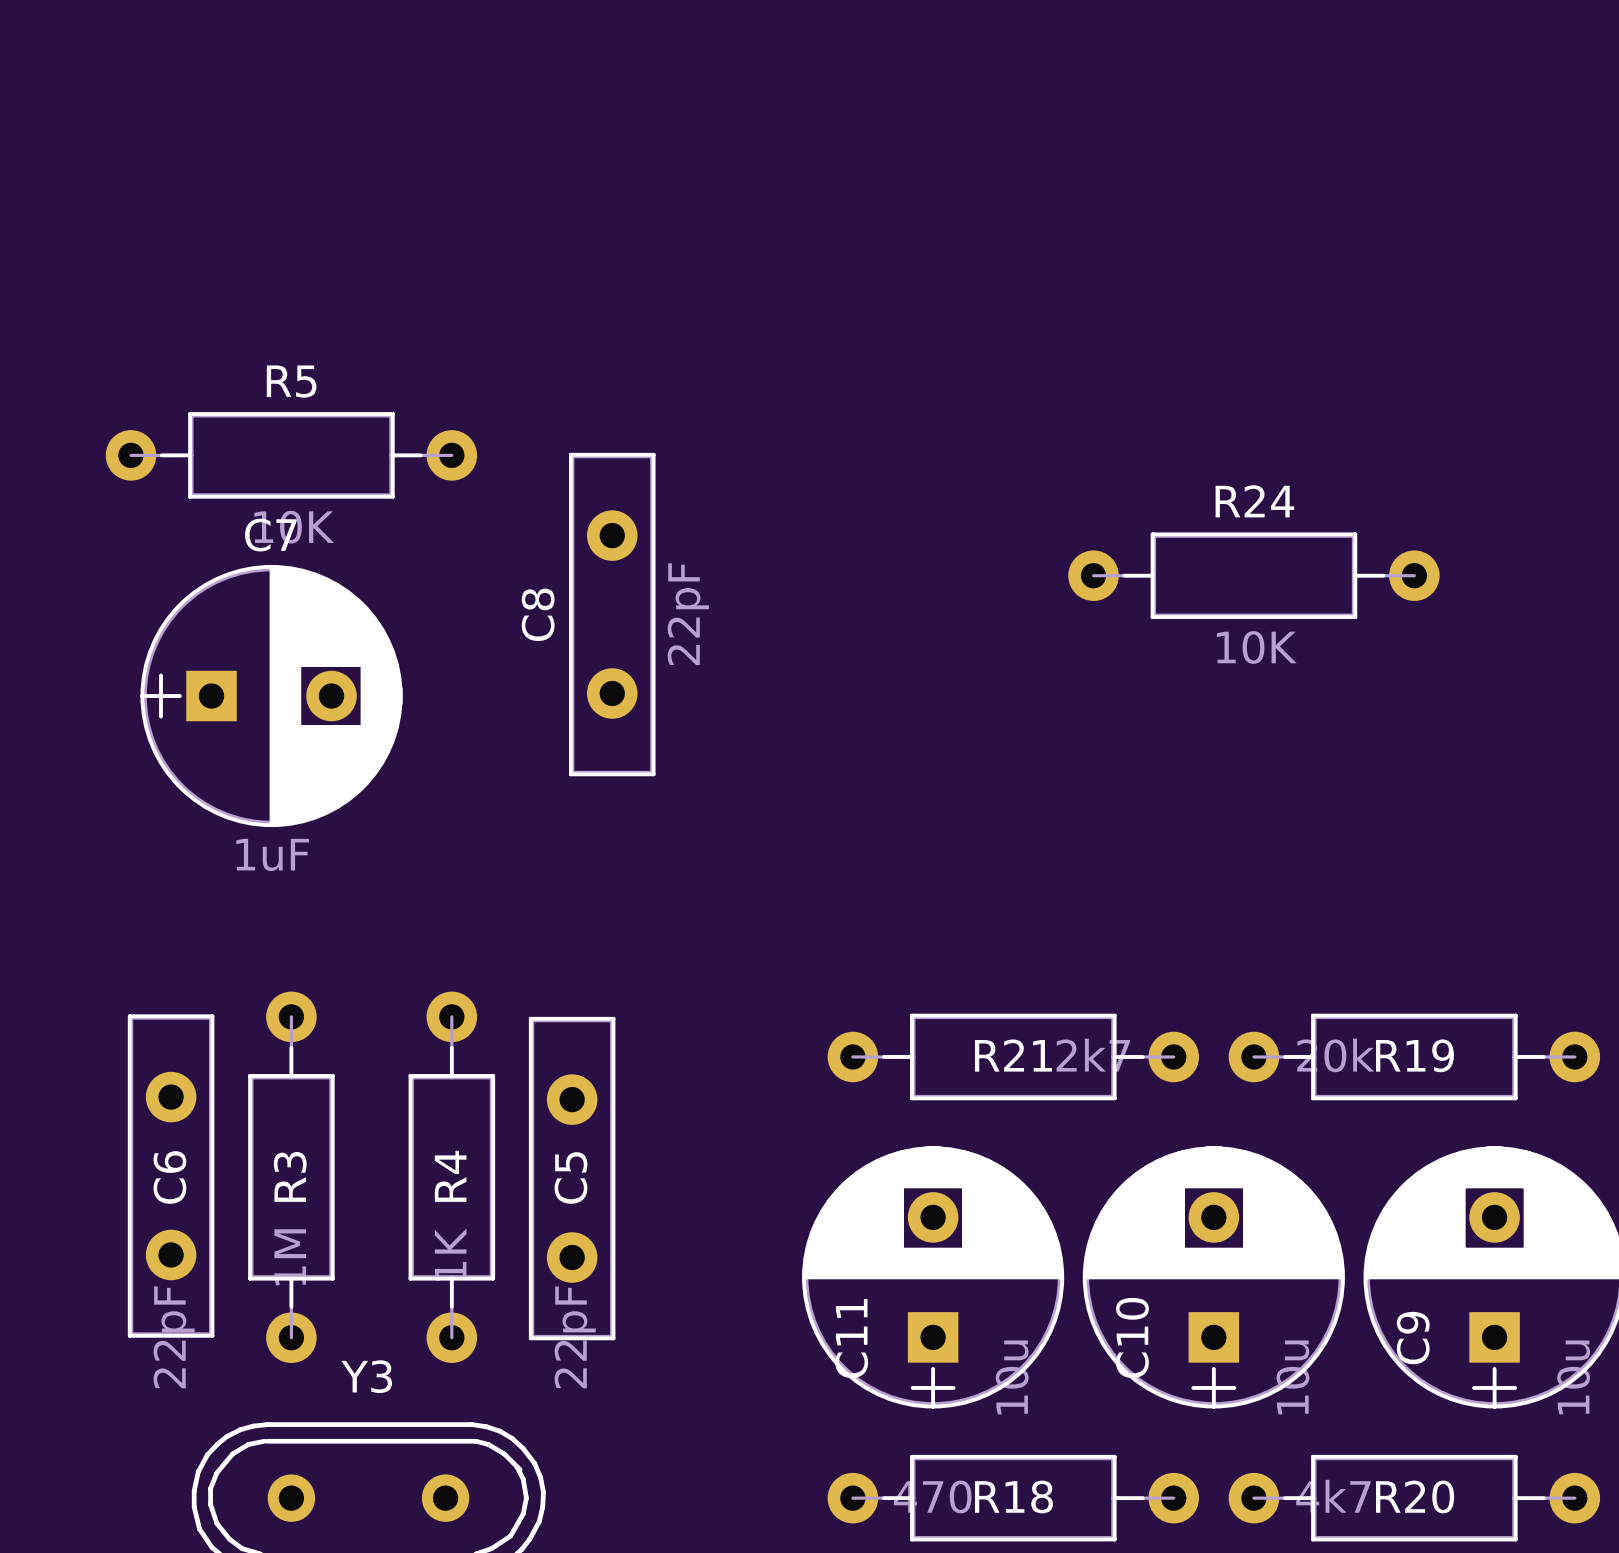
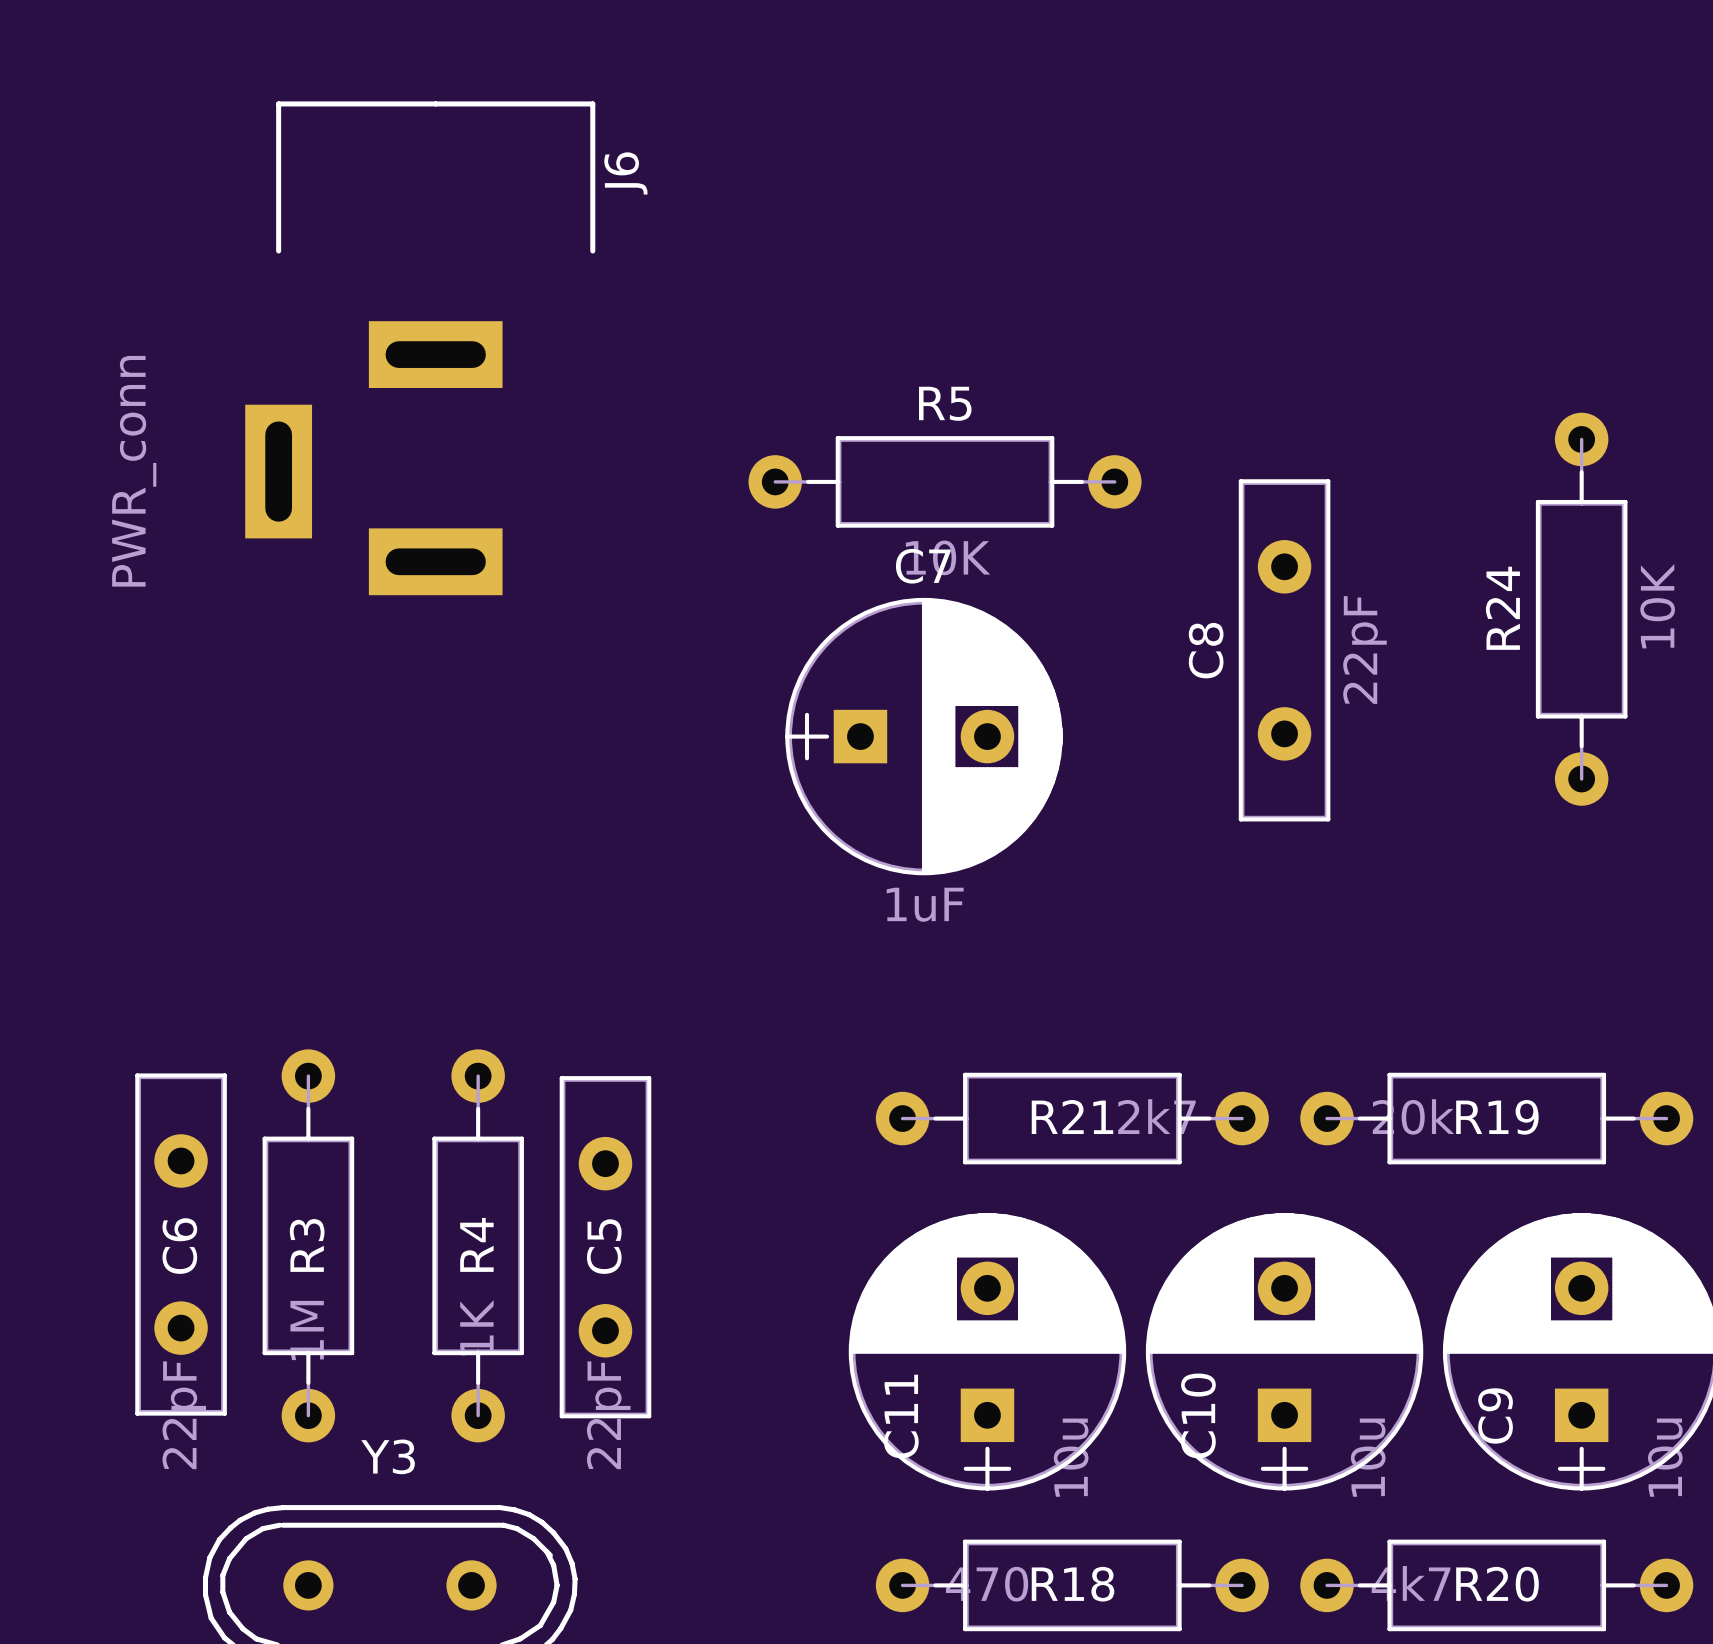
J6: none -> PWR_conn (420, 348)
R5 position: (291, 455) -> (945, 481)
R24 name position: R24 (1254, 501) -> R24 (1502, 608)
R24 rotation: 0° (1253, 575) -> 90° clockwise (1581, 609)
R24 position: (1253, 575) -> (1581, 609)
C8 position: (612, 614) -> (1284, 650)
R24 value position: 10K (1256, 647) -> 10K (1657, 606)
C7 position: (271, 696) -> (923, 736)

